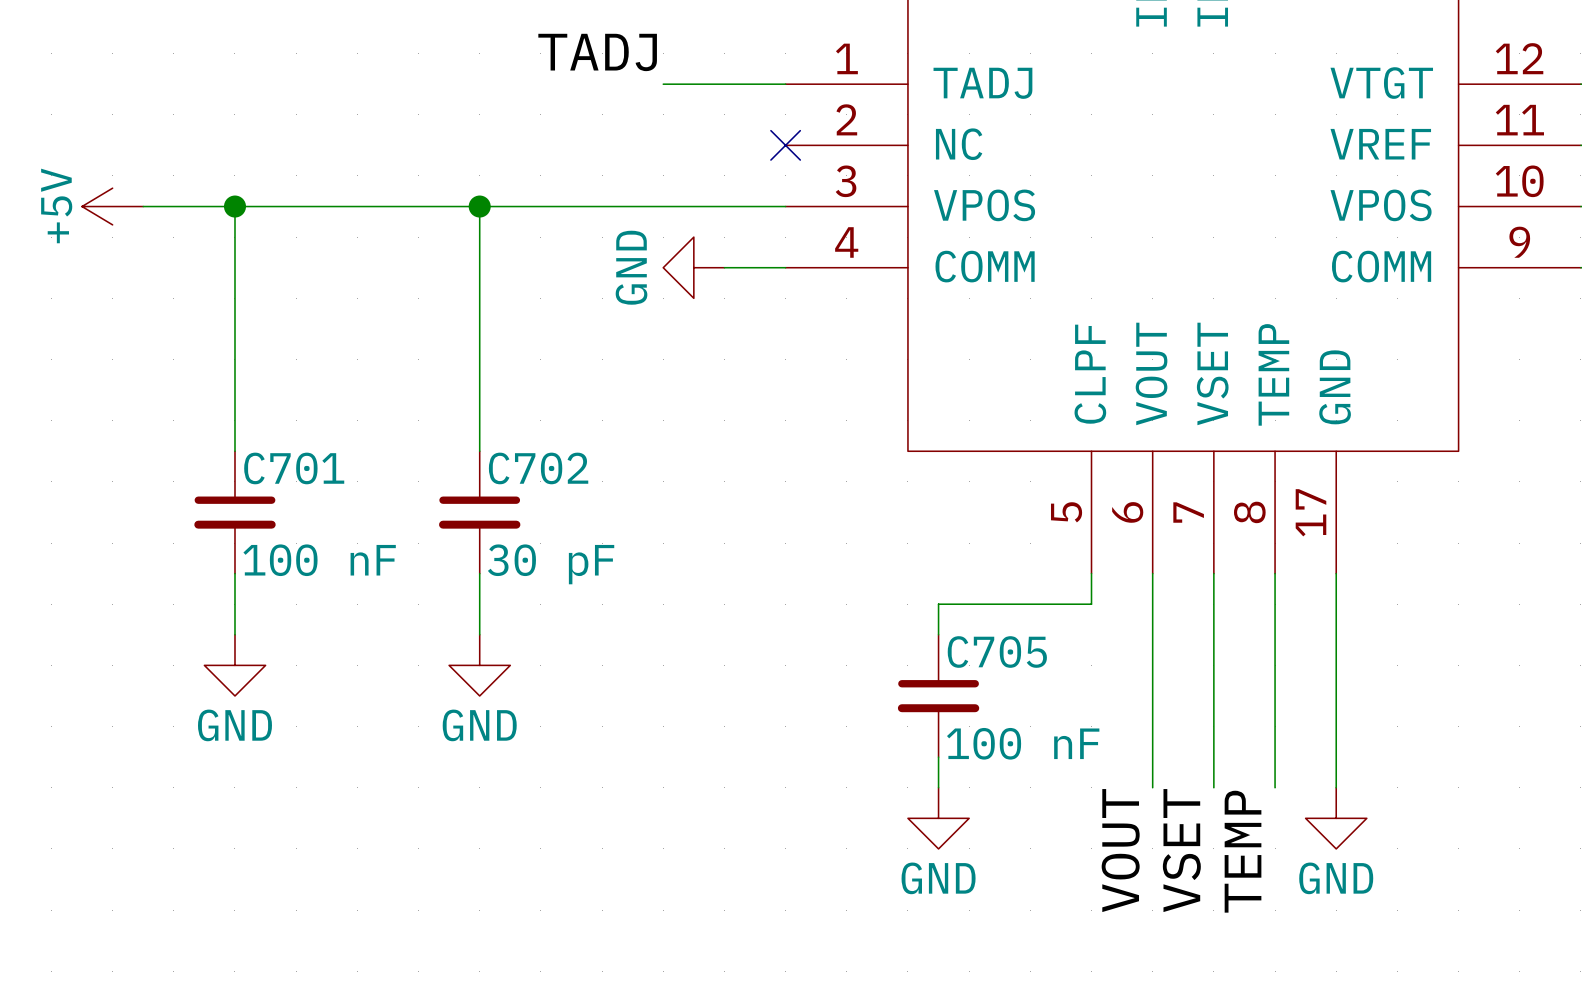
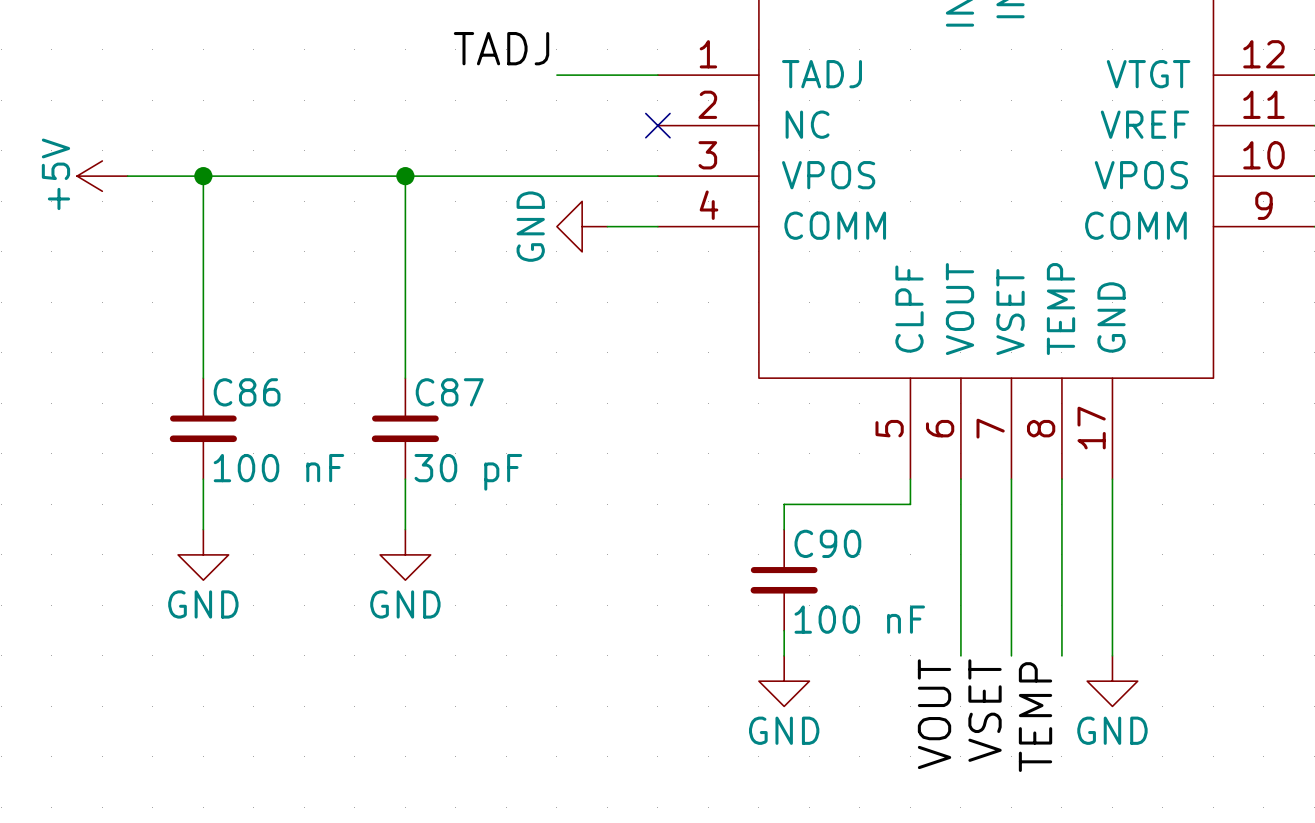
C701 name: C701 (294, 468) -> C86 (247, 392)
C702 name: C702 (538, 468) -> C87 (449, 392)
C705 name: C705 (997, 652) -> C90 (827, 543)

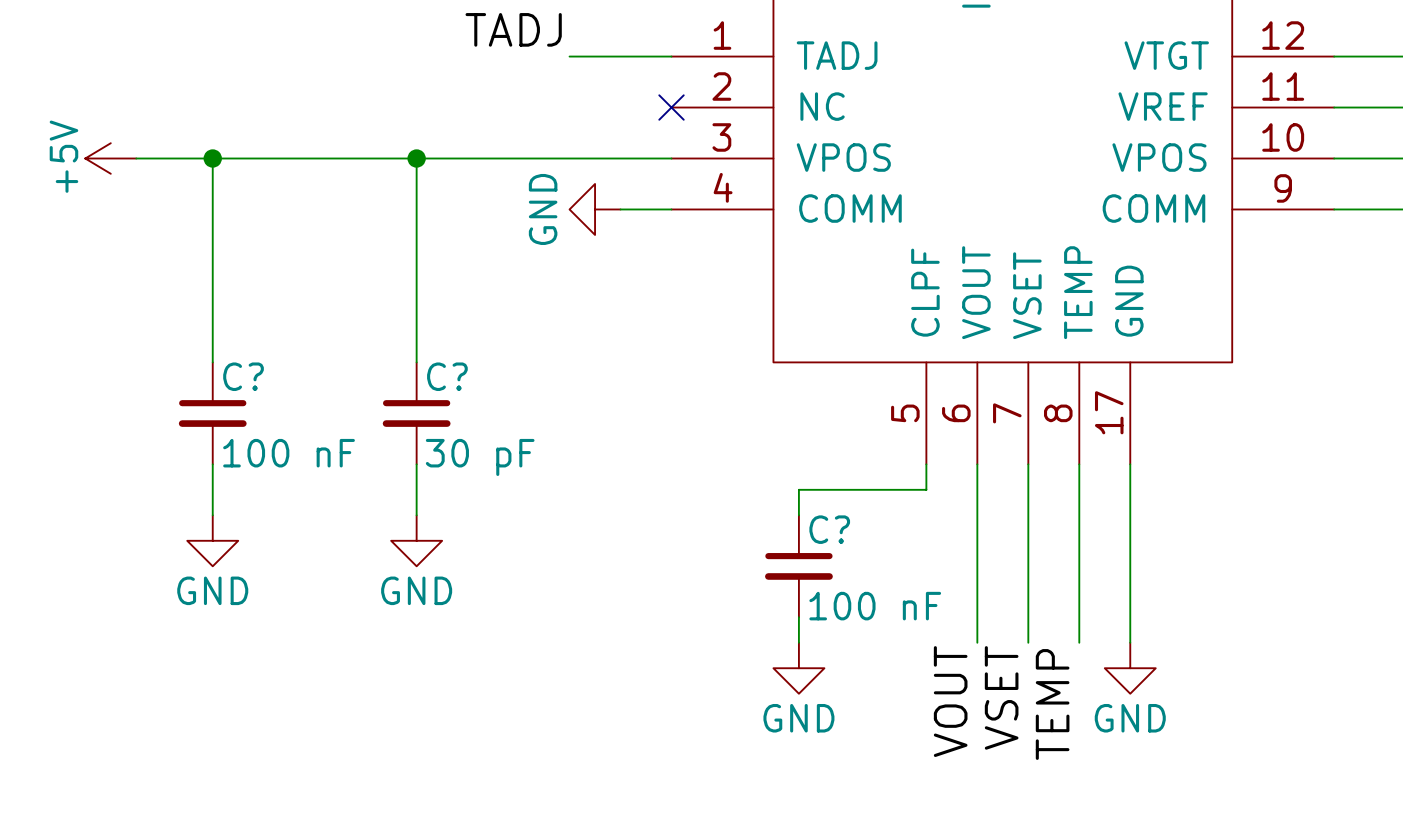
C86 name: C86 (247, 392) -> C? (243, 376)
C87 name: C87 (449, 392) -> C? (447, 376)
C90 name: C90 (827, 543) -> C? (829, 529)

